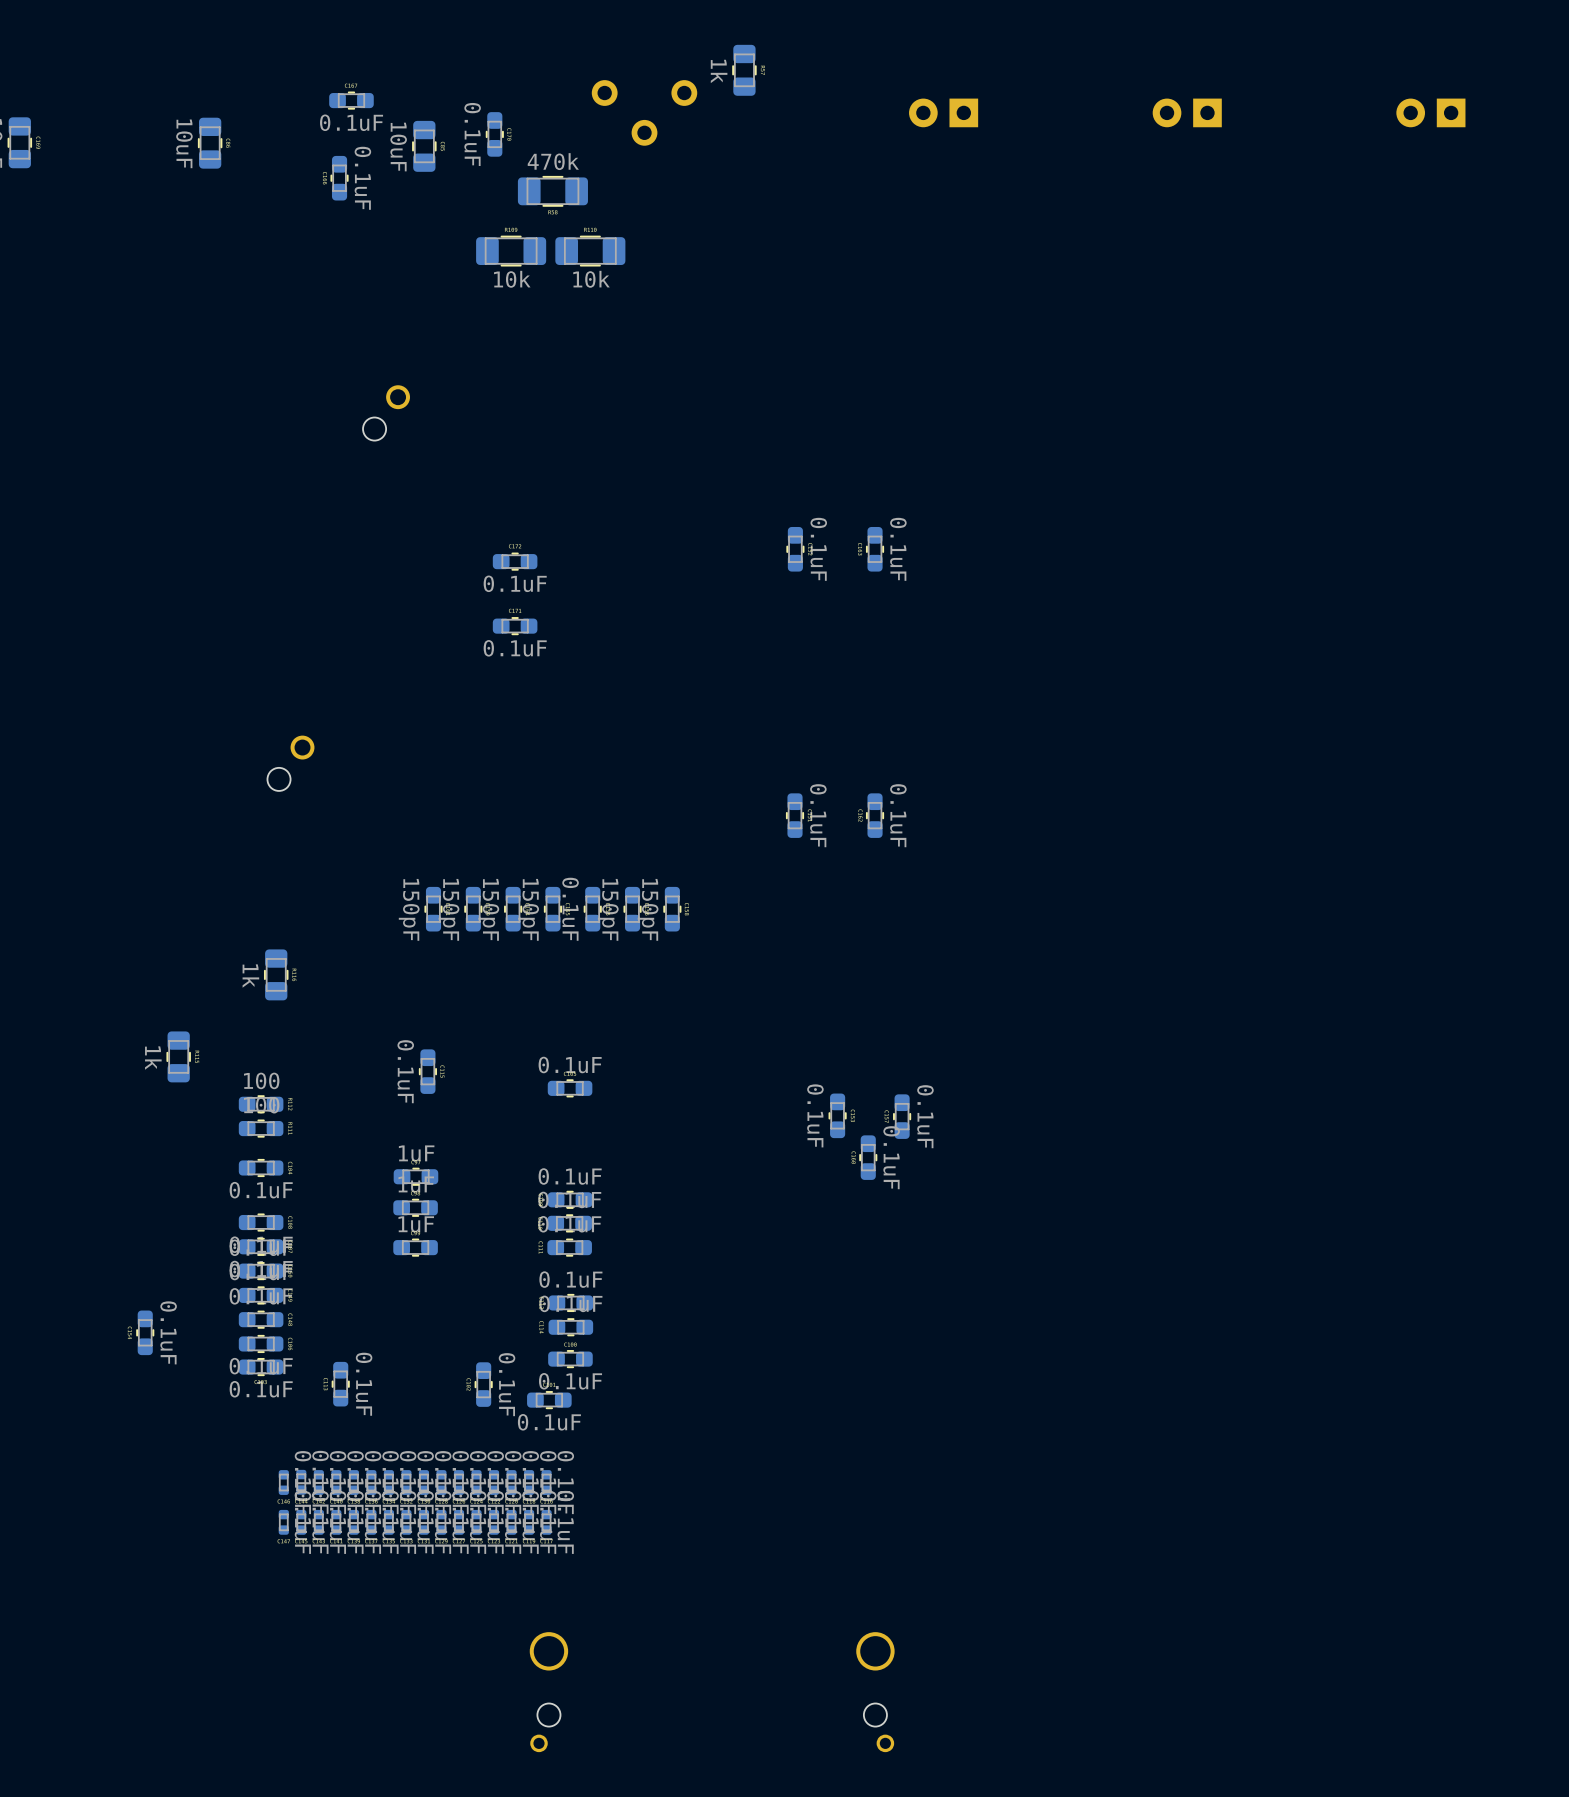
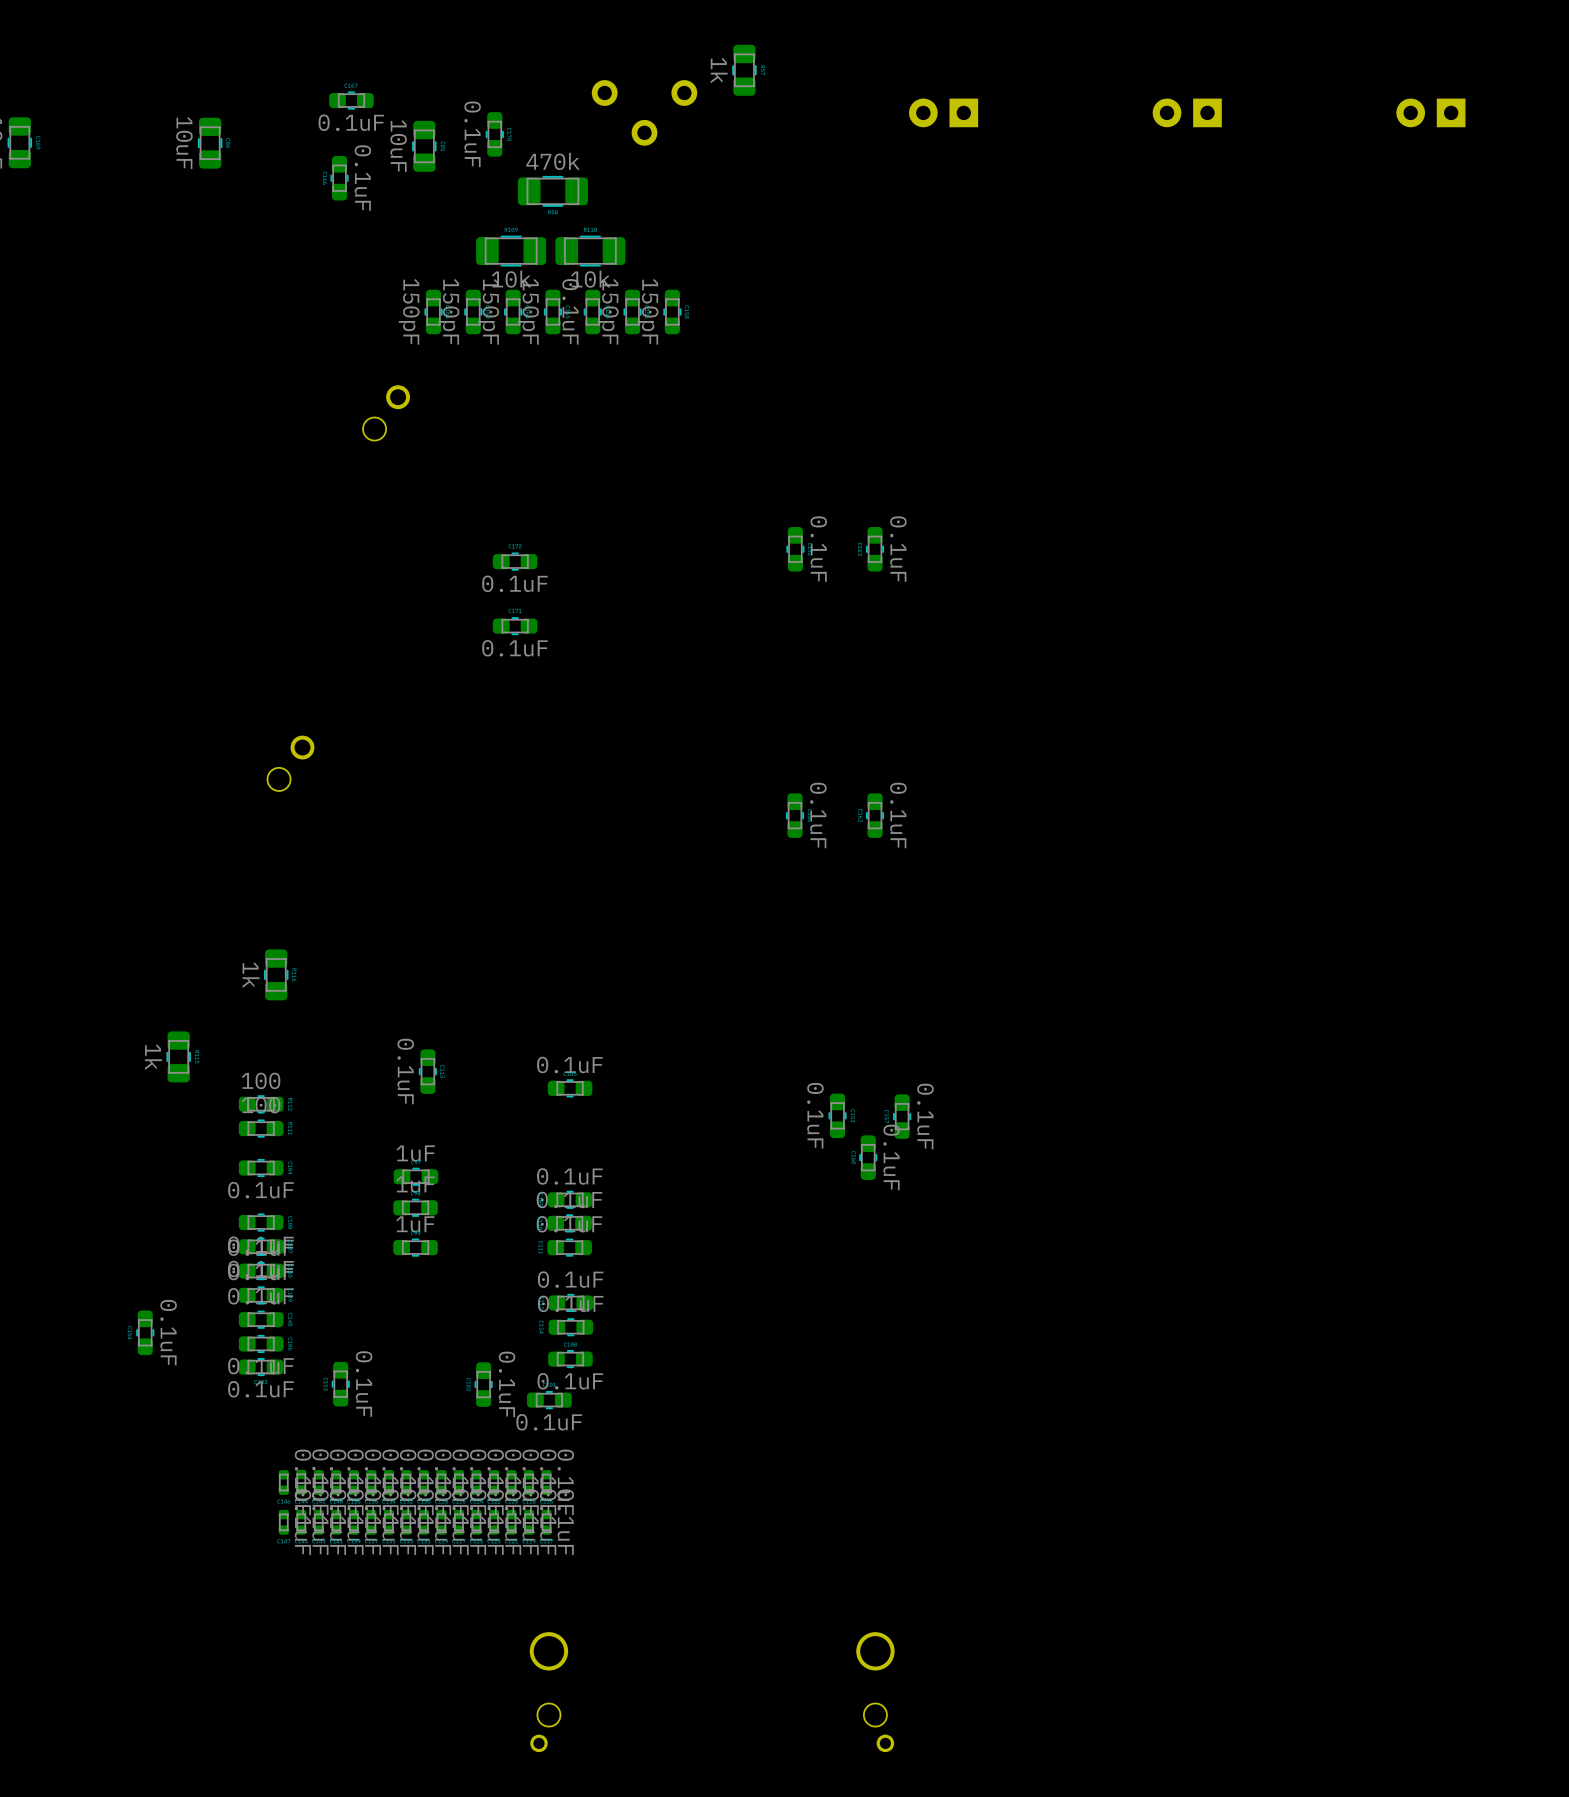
part position: (433, 909) -> (433, 311)
part position: (473, 909) -> (473, 311)
part position: (513, 909) -> (513, 311)
part position: (552, 909) -> (552, 311)
part position: (592, 909) -> (592, 311)
part position: (632, 909) -> (632, 311)
part position: (672, 909) -> (672, 311)

